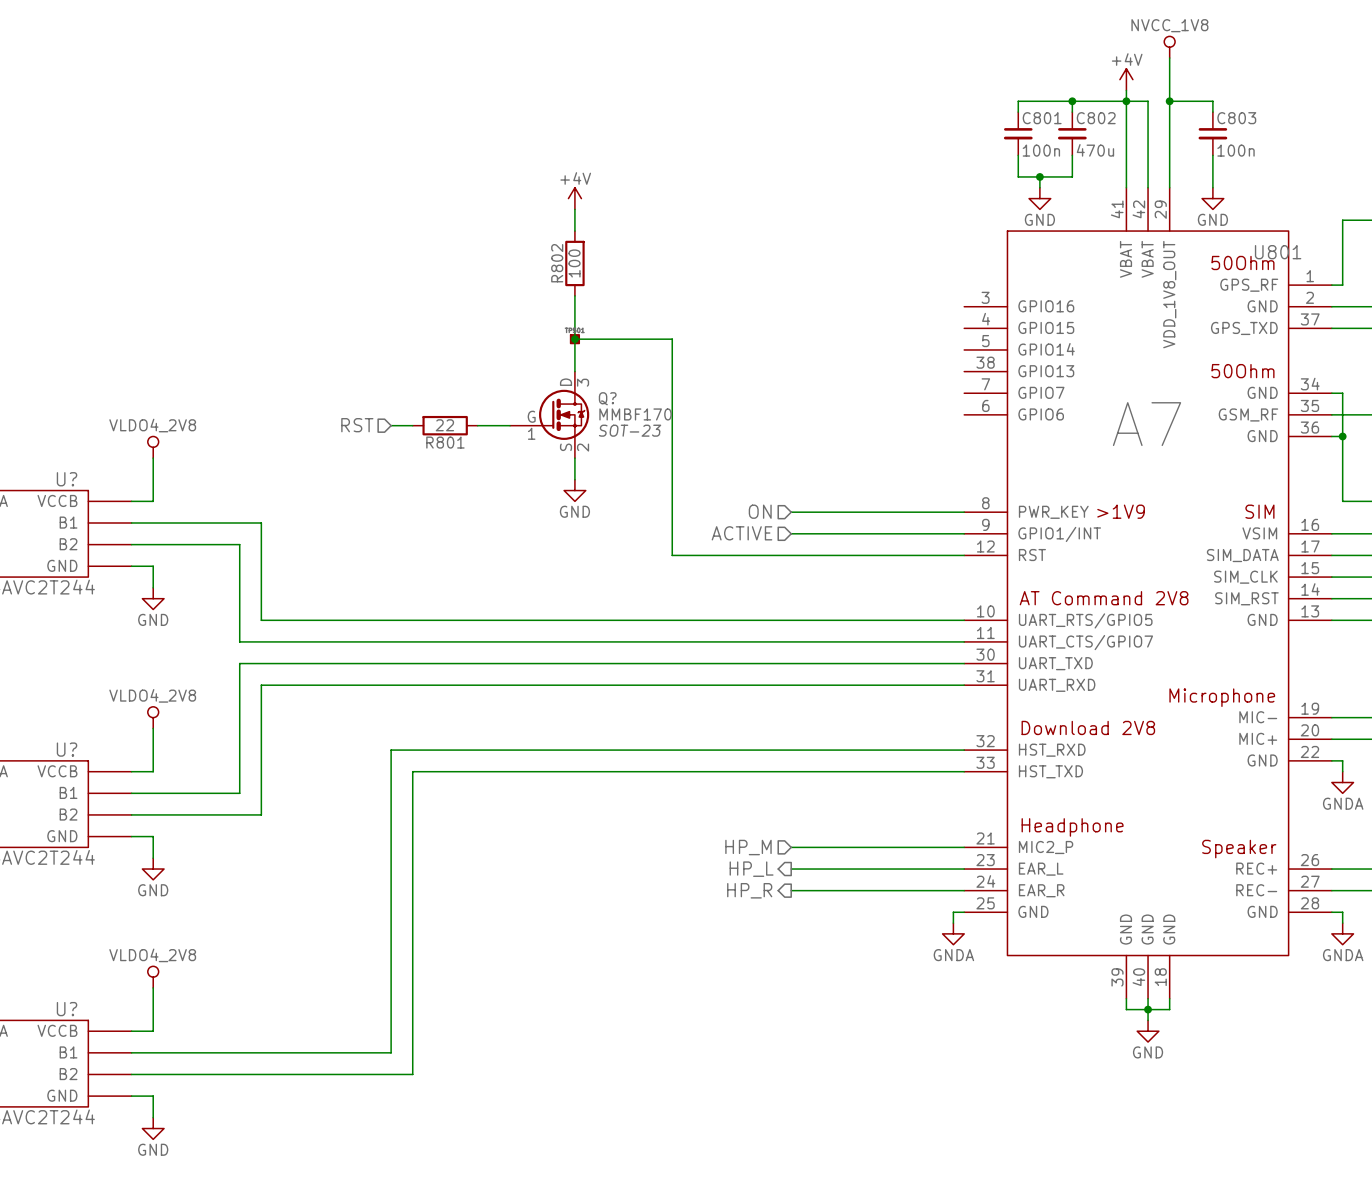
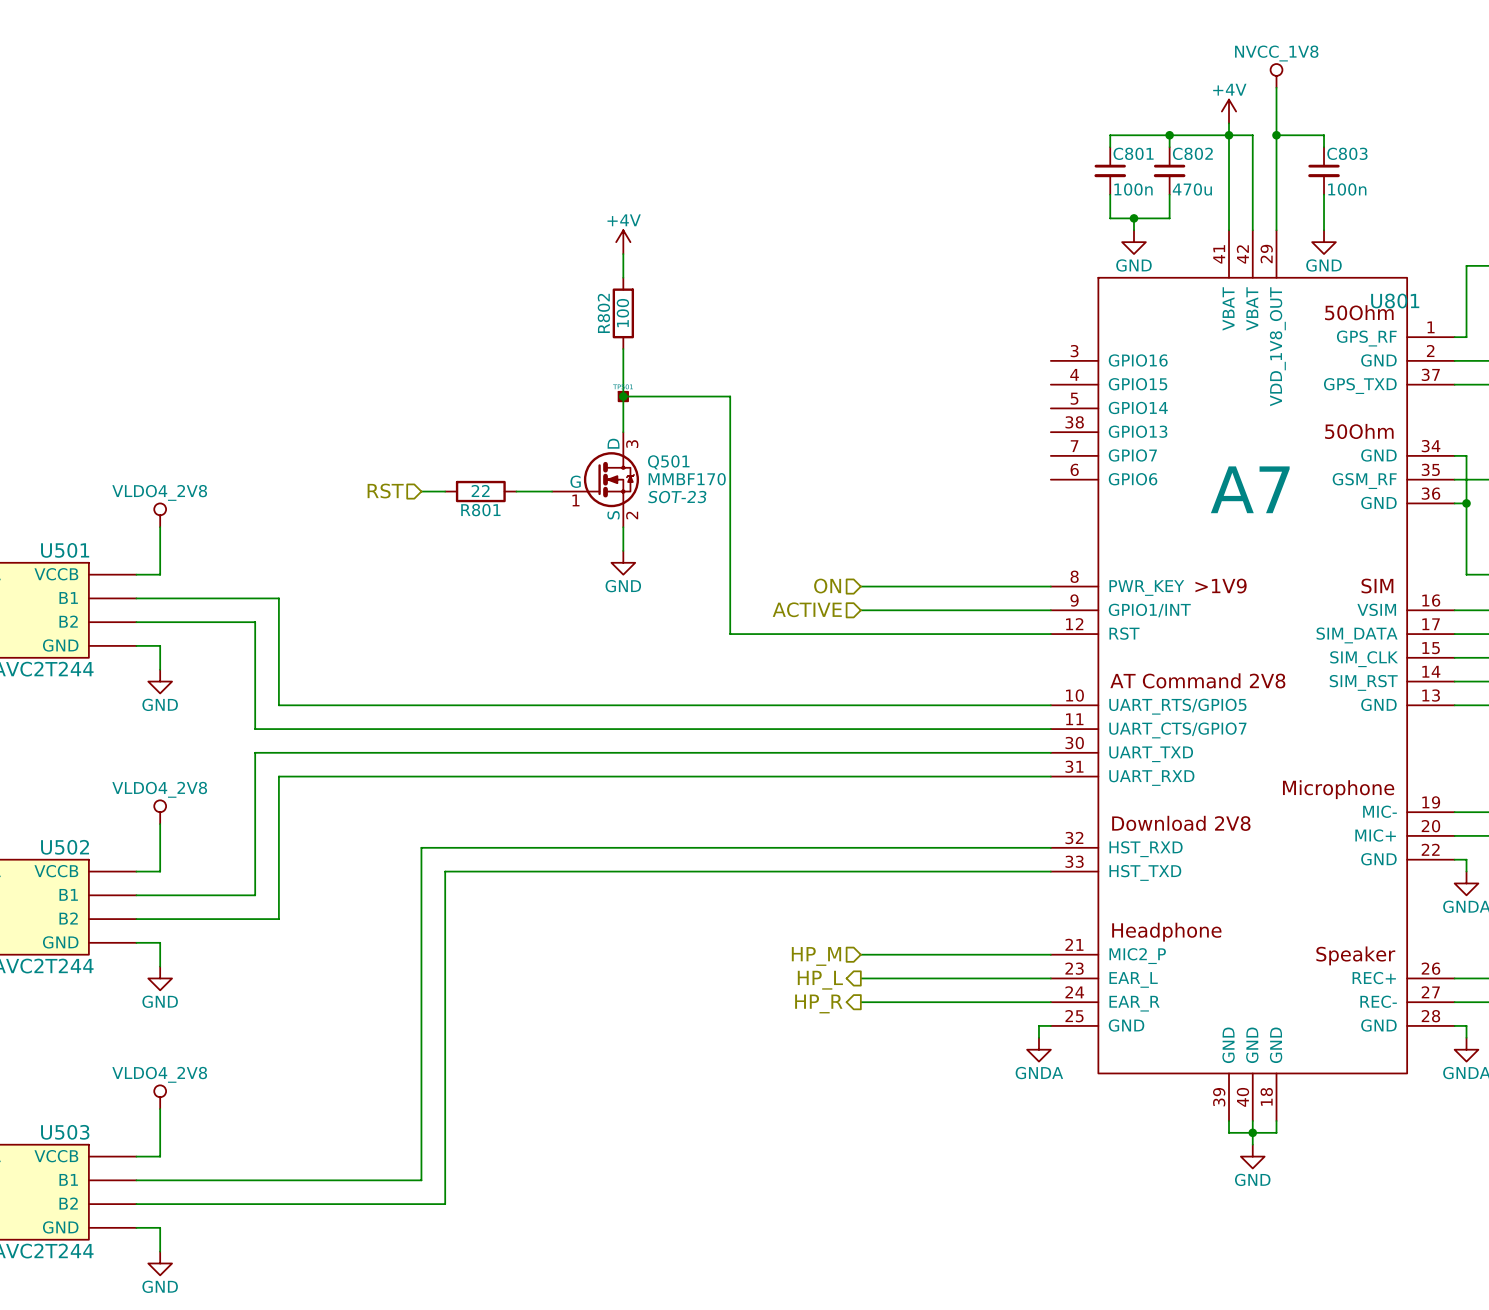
Q? name: Q? (607, 398) -> Q501 (668, 462)
U? name: U? (67, 479) -> U501 (65, 550)
U? name: U? (67, 749) -> U502 (65, 847)
U? name: U? (67, 1009) -> U503 (65, 1132)

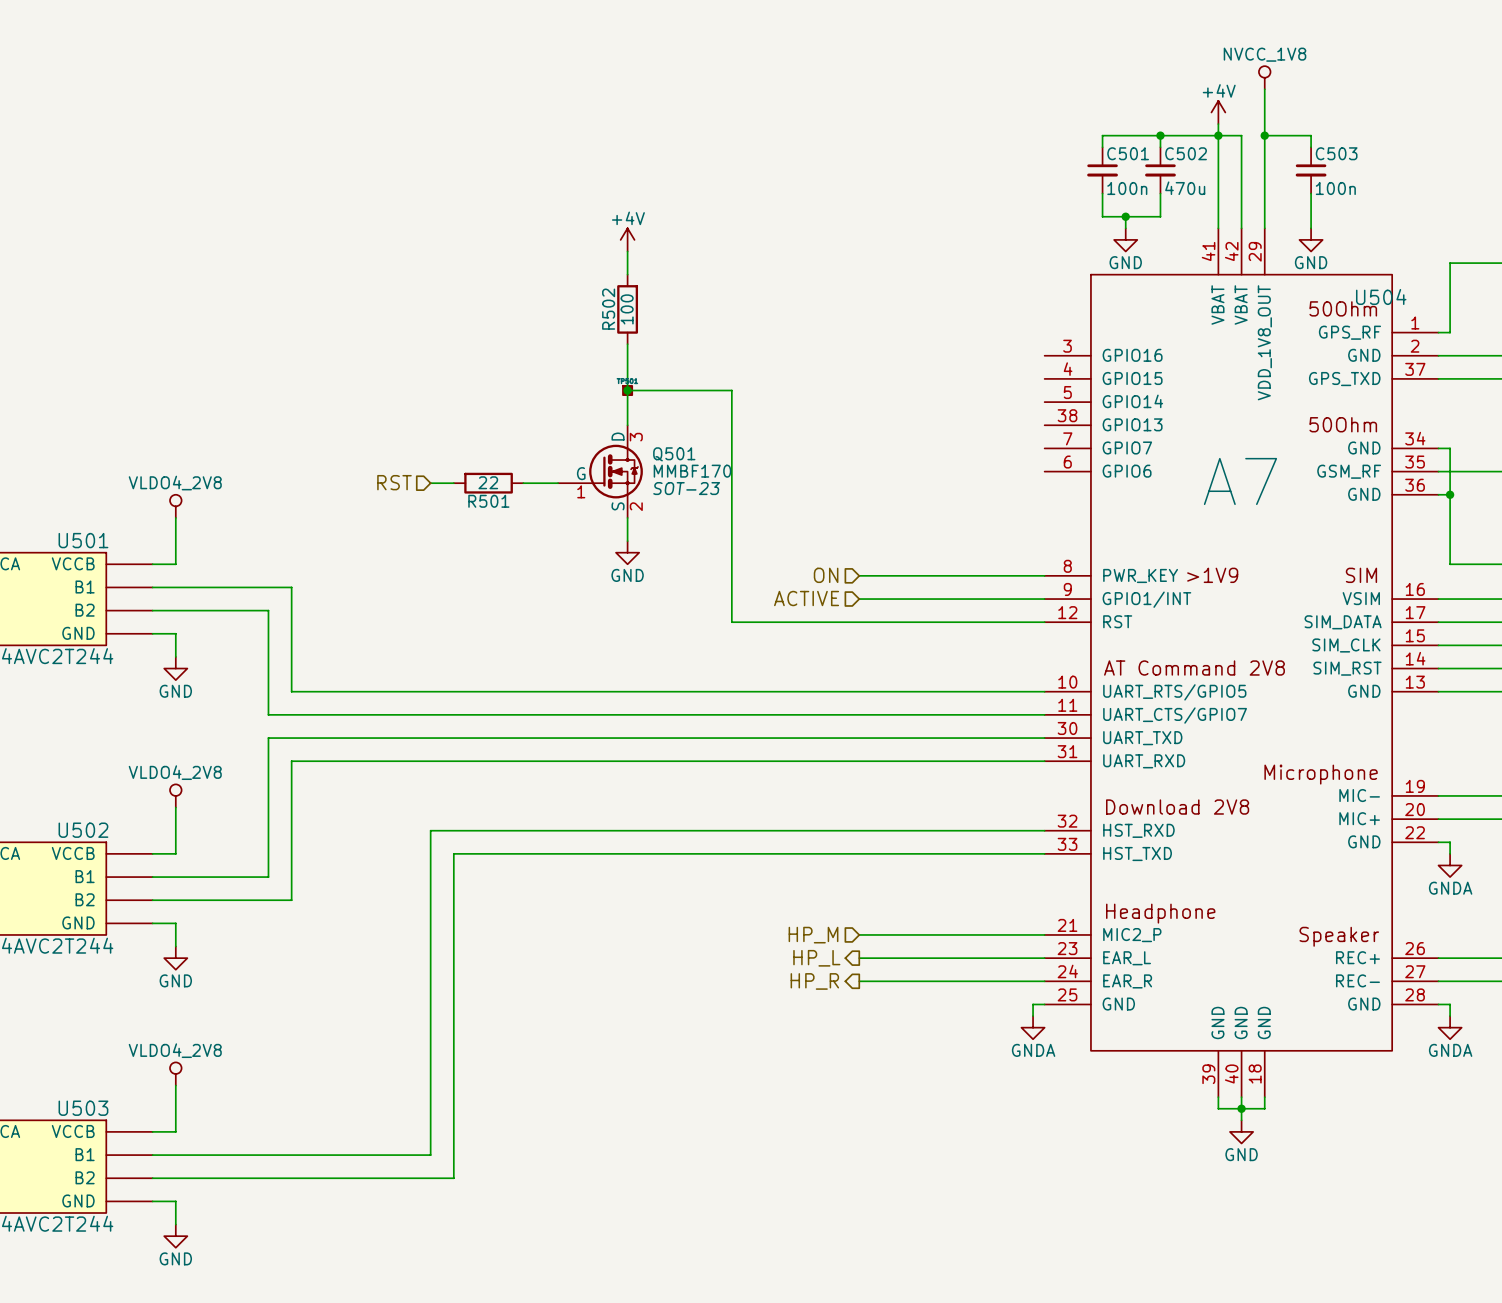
C801 name: C801 (1133, 153) -> C501 (1128, 153)
C802 name: C802 (1192, 153) -> C502 (1186, 153)
C803 name: C803 (1347, 153) -> C503 (1336, 153)
U801 name: U801 (1395, 301) -> U504 (1381, 296)
R802 name: R802 (603, 313) -> R502 (608, 309)
R801 name: R801 (480, 510) -> R501 (488, 501)

